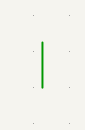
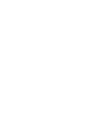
wire: (42, 42) (42, 87) -> none

